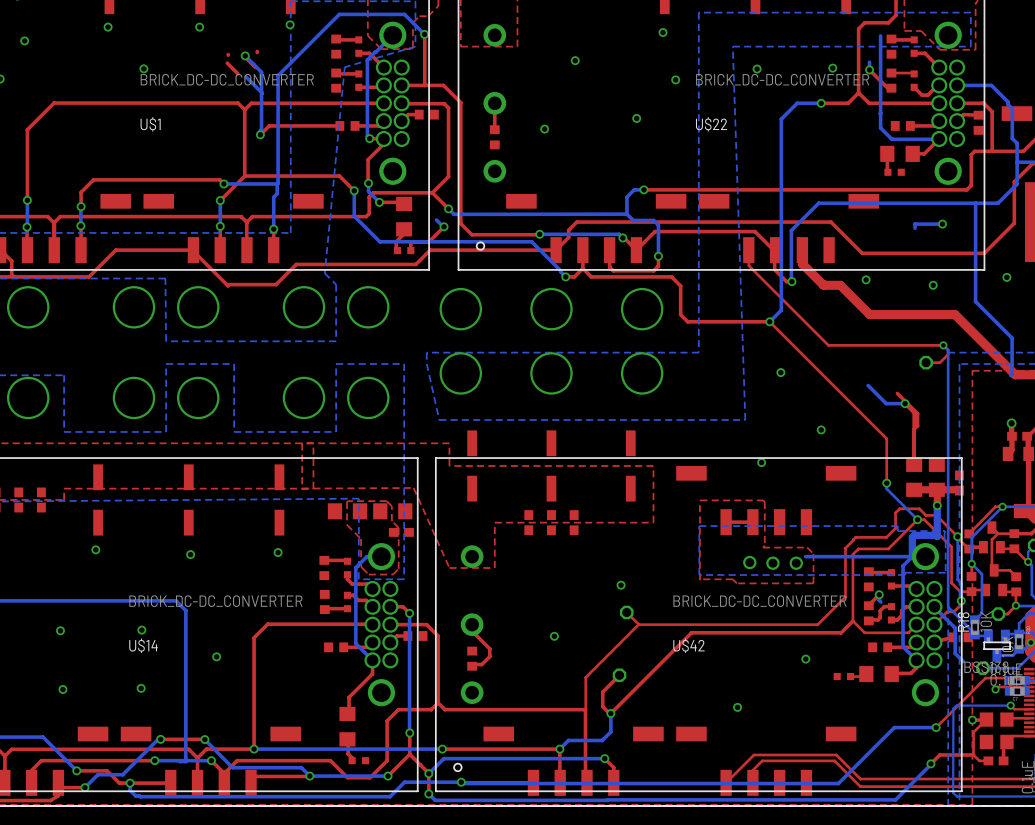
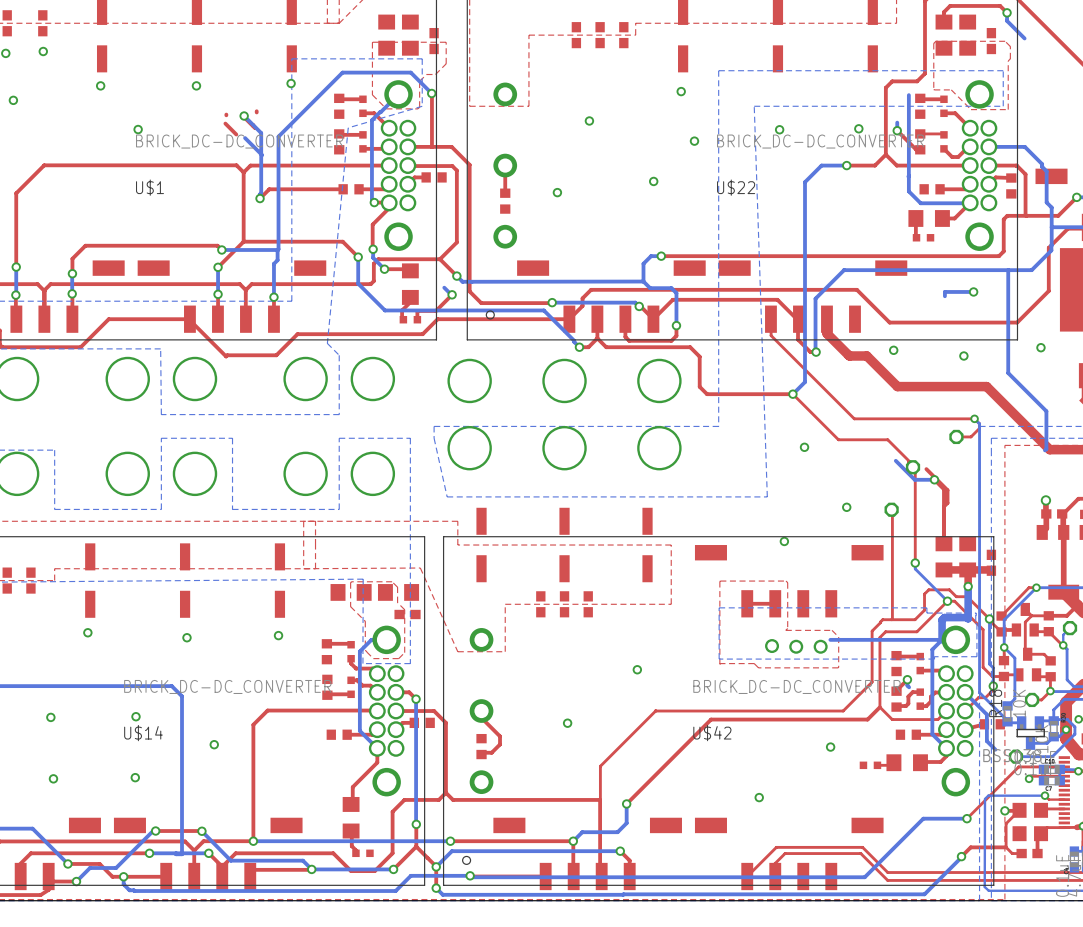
top track: (813, 365) (886, 438) -> (838, 439) (887, 439) (913, 465) (913, 467) (908, 462) (915, 468) (915, 516)
part: none -> (913, 467)
top track: none -> (891, 509) (891, 619)
part: none -> (891, 509)
top track: (626, 612) (638, 624) -> none
part: (626, 612) -> none
top track: (619, 675) (602, 691) (602, 706) (609, 713) -> none
part: (619, 675) -> none

